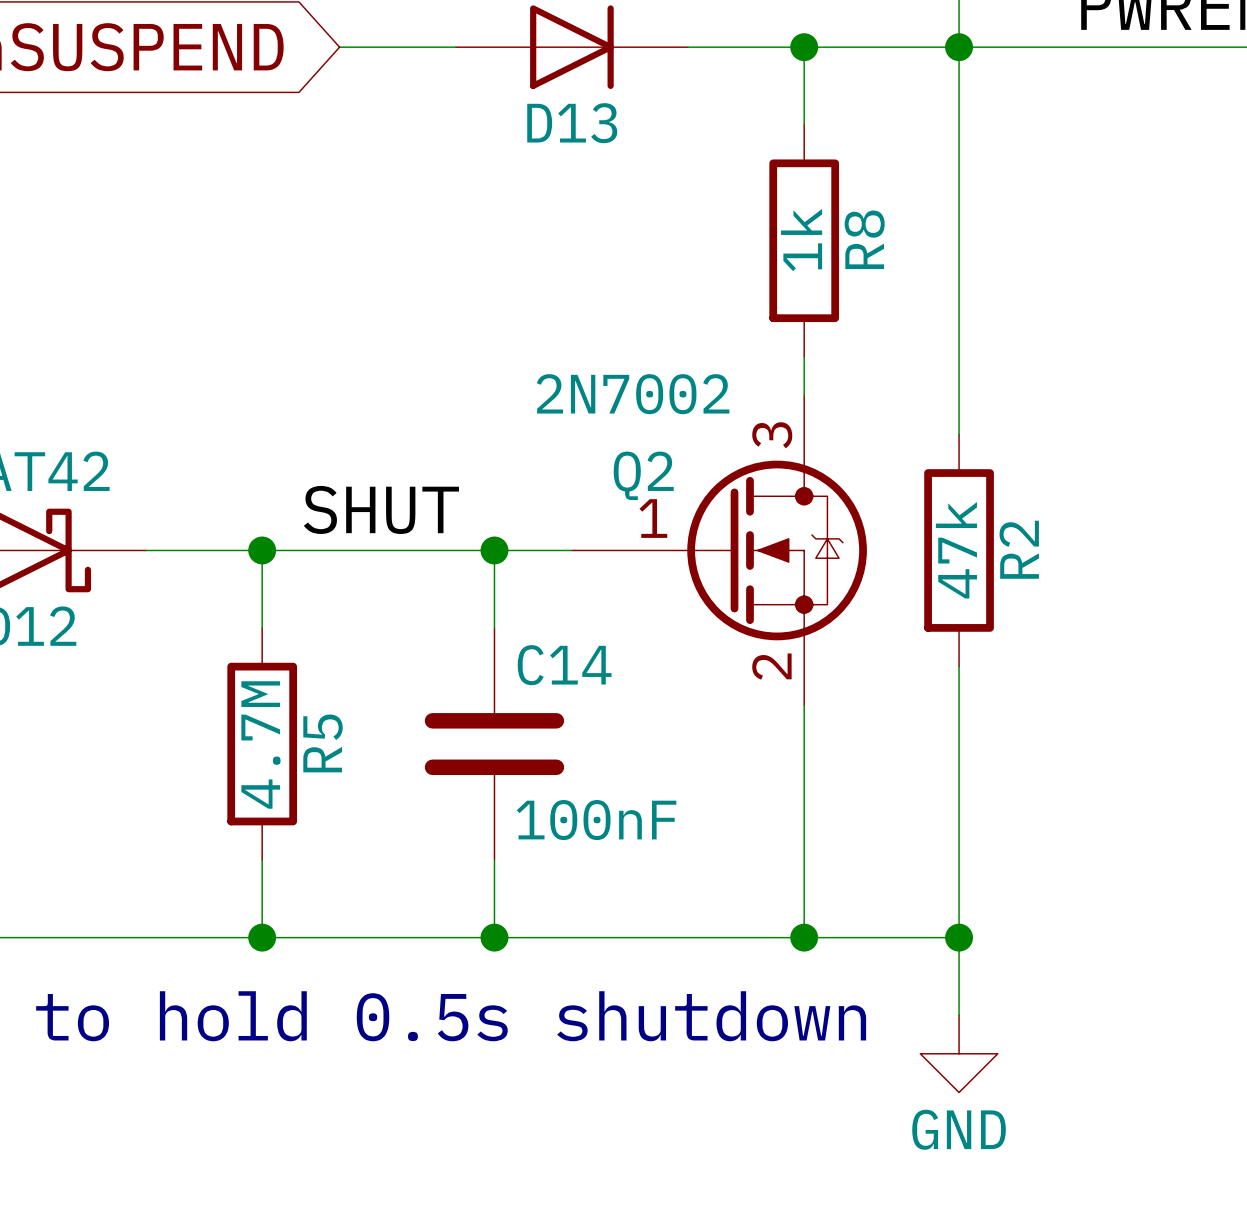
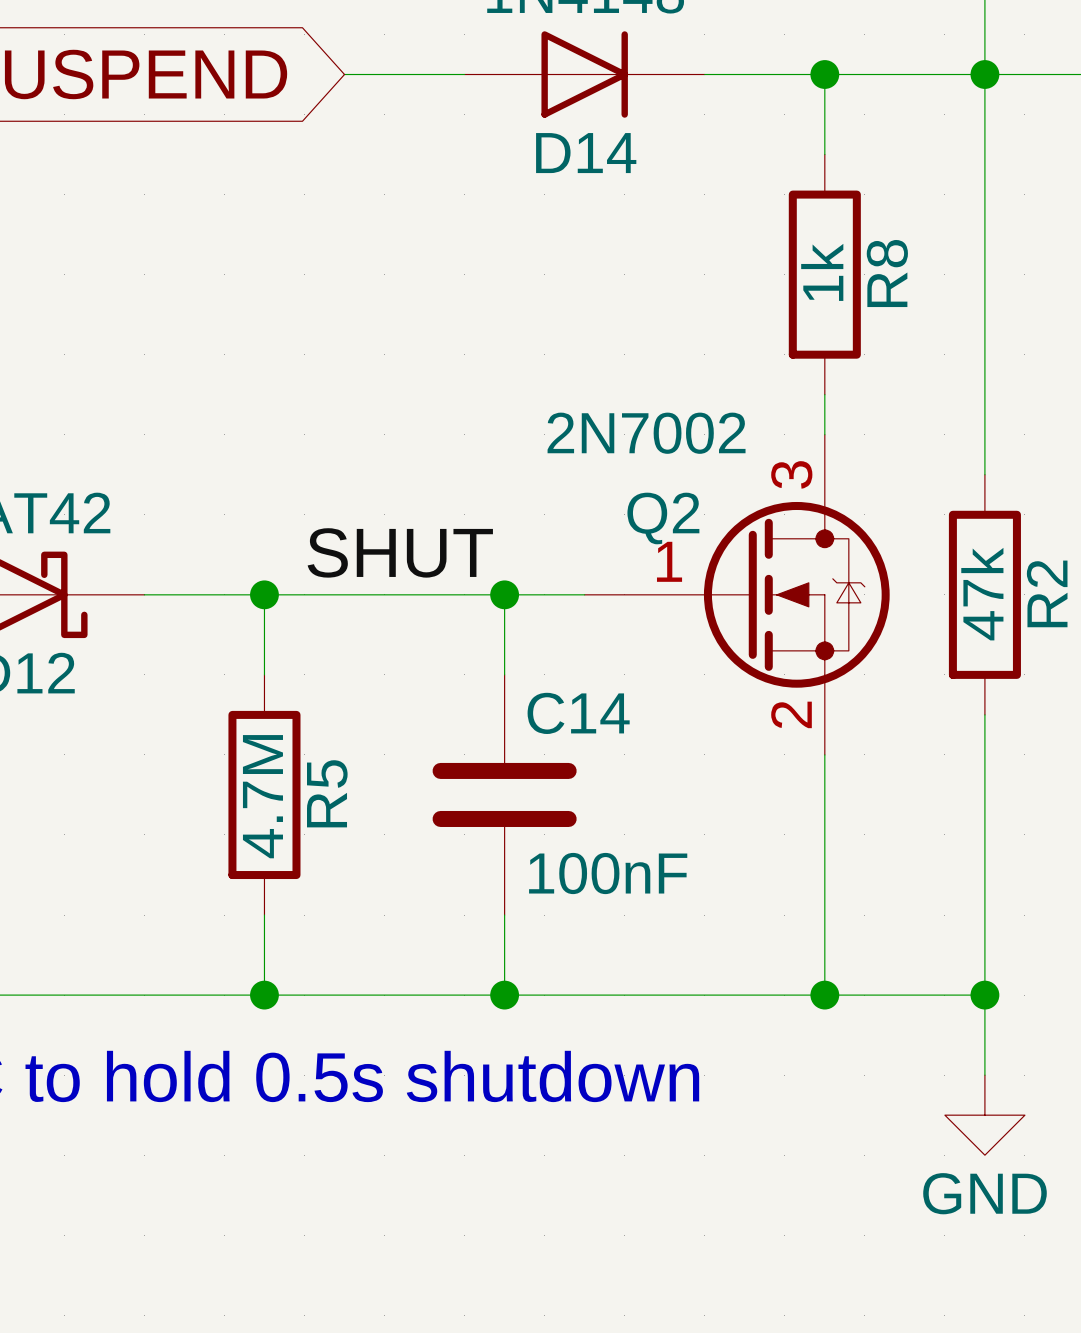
D13 name: D13 (572, 123) -> D14 (586, 153)

